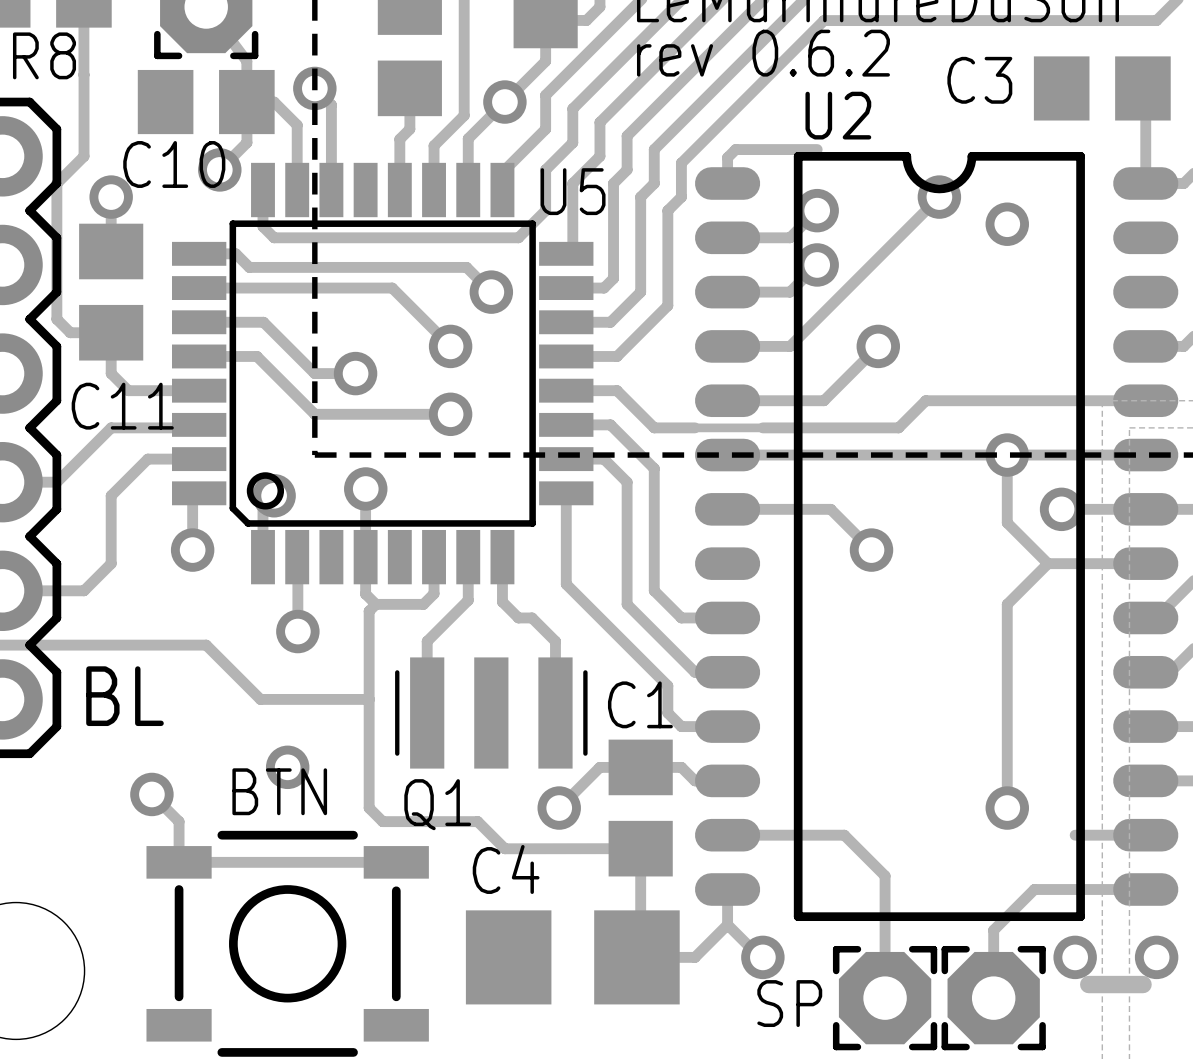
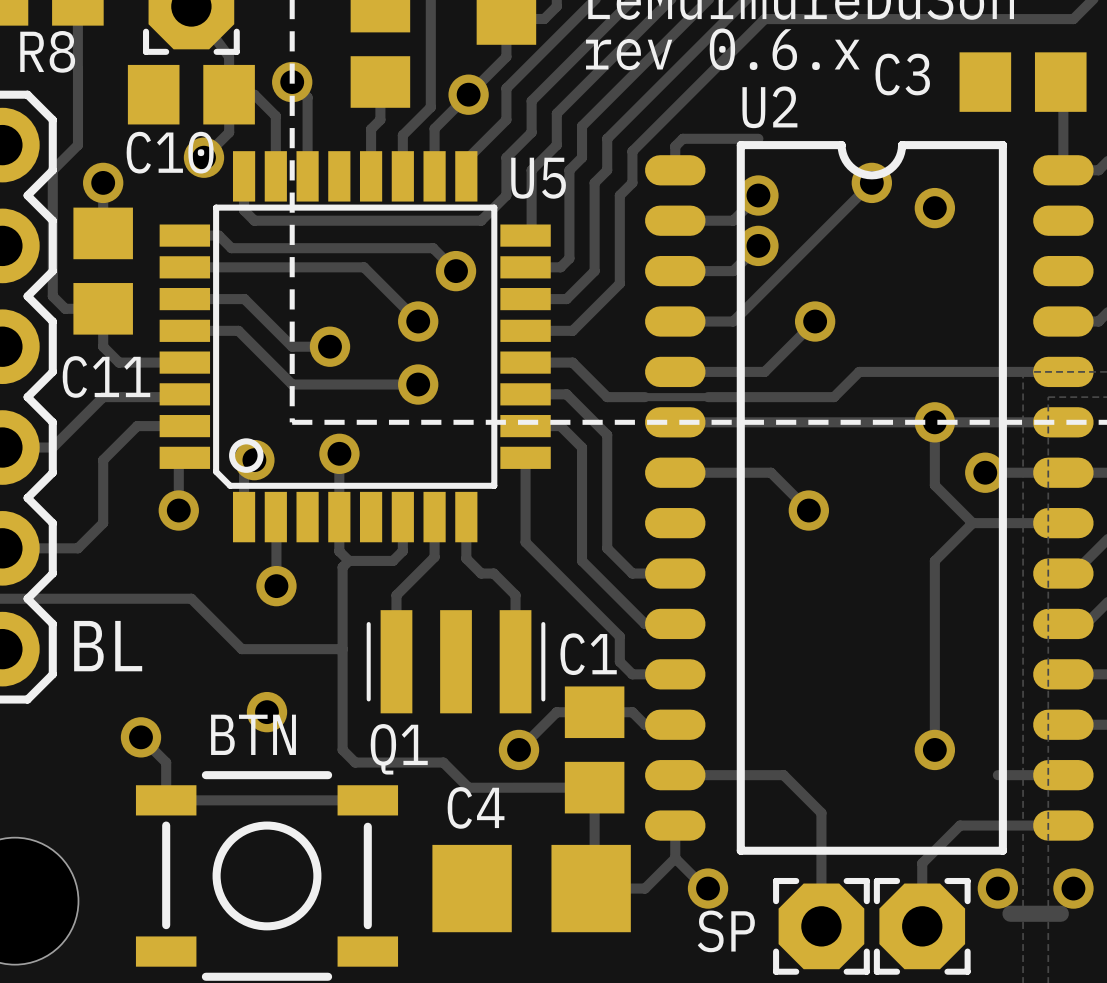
text: rev 0.6.2 (763, 53) -> rev 0.6.x (722, 49)

